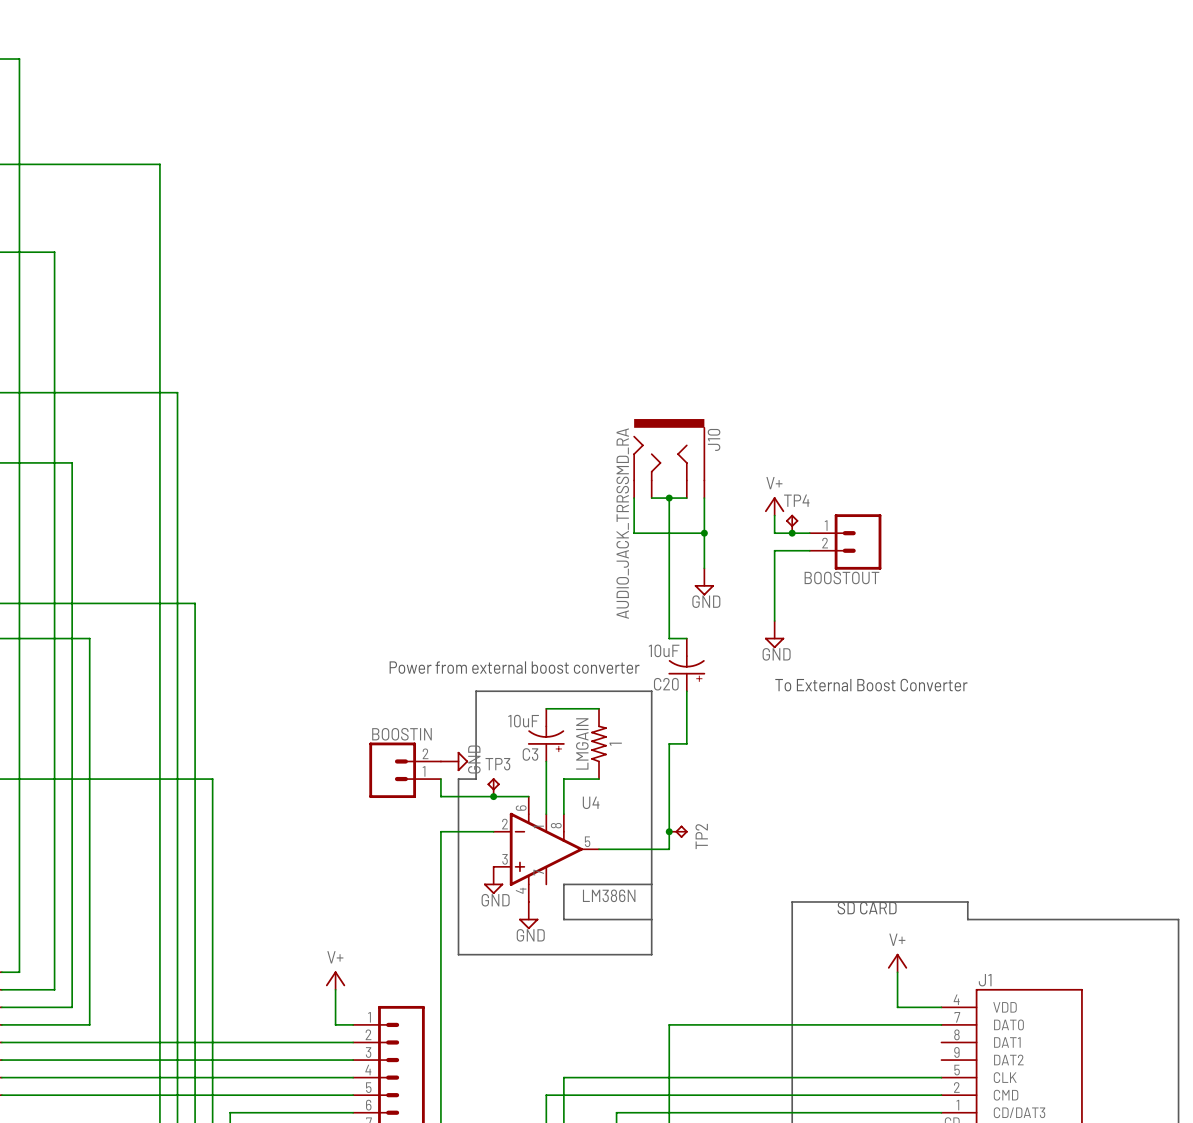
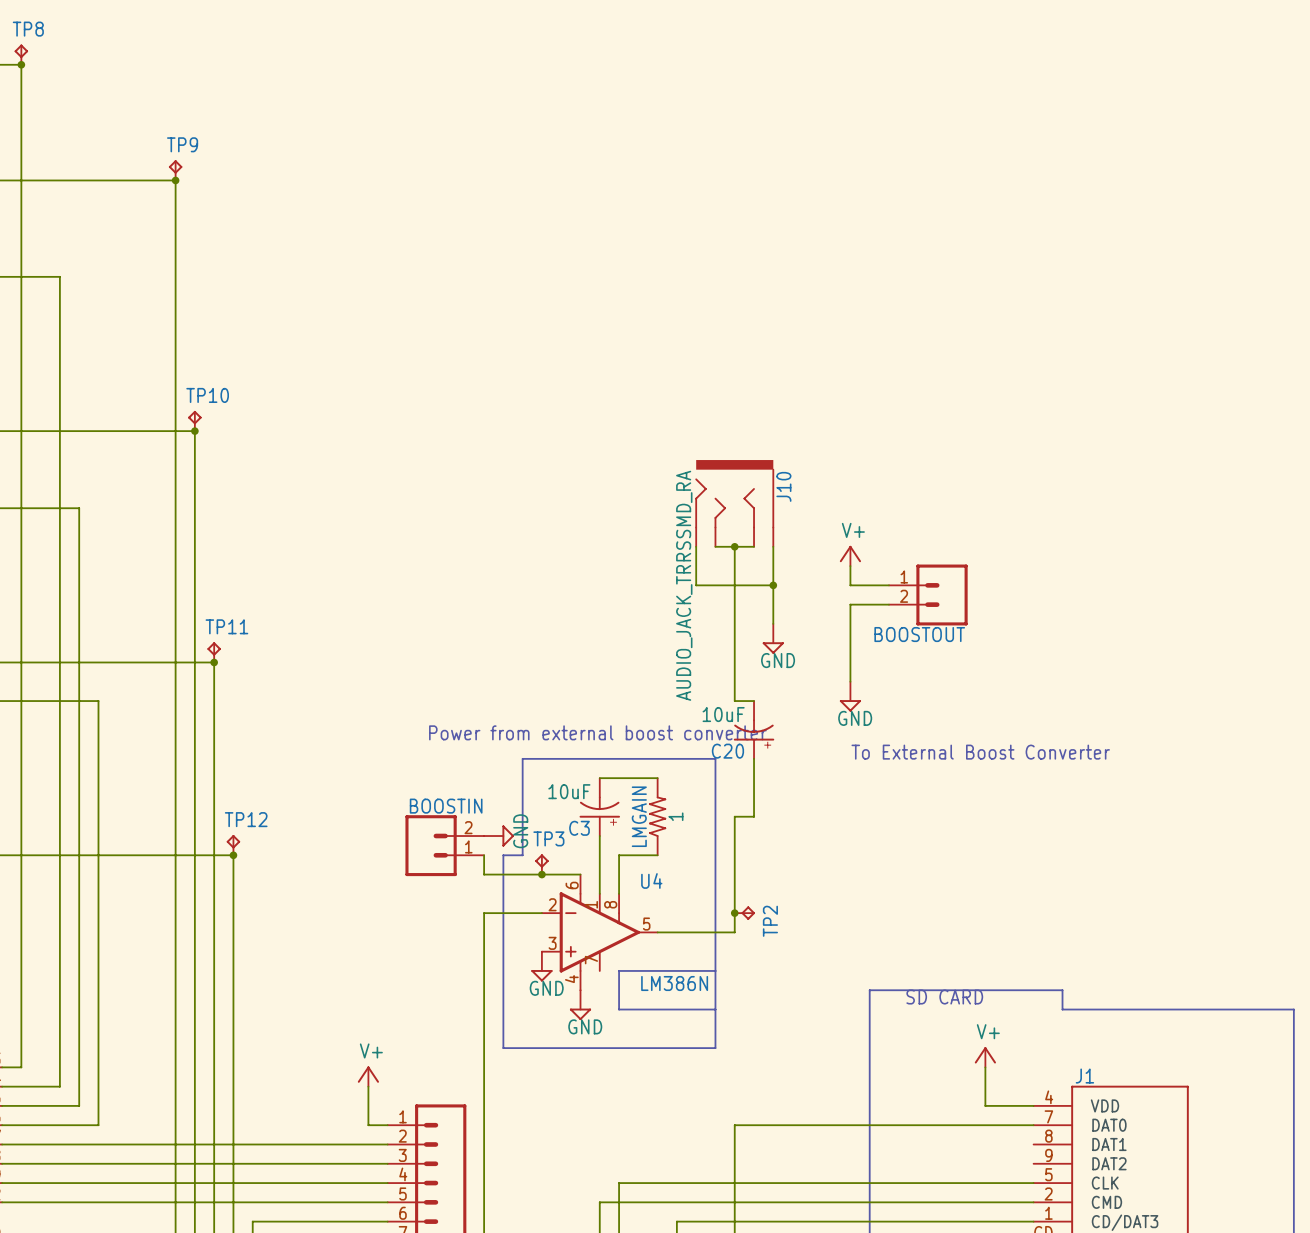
TP8: none -> (21, 54)
junction: none -> (21, 64)
TP9: none -> (175, 170)
junction: none -> (175, 180)
TP10: none -> (194, 420)
junction: none -> (194, 431)
TP4: (792, 523) -> none
junction: (792, 533) -> none
TP11: none -> (214, 652)
junction: none -> (214, 662)
TP12: none -> (233, 845)
junction: none -> (233, 855)

